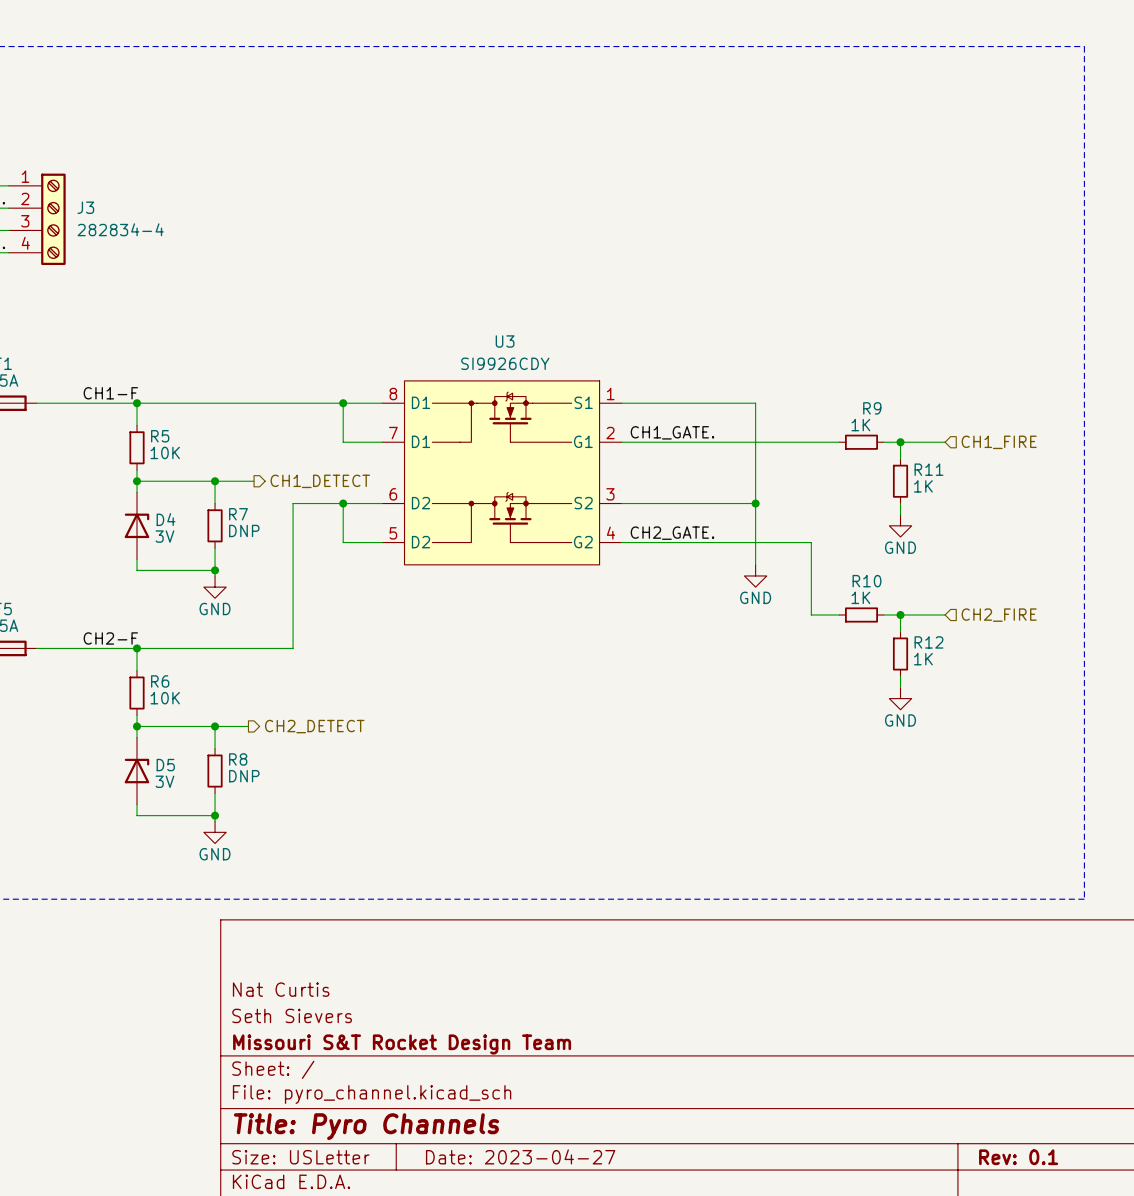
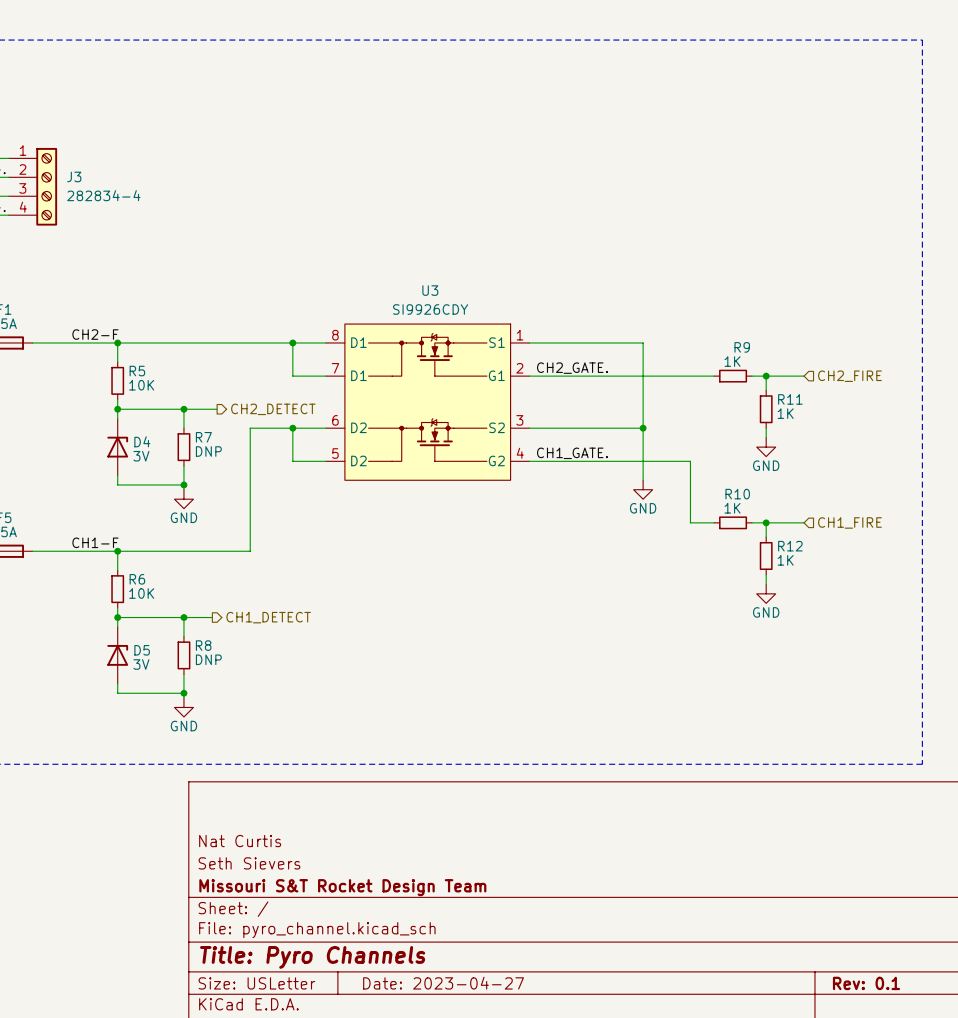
label: CH1-F (110, 393) -> CH2-F (95, 334)
label: CH1_GATE. (672, 432) -> CH2_GATE. (572, 368)
hierarchical label: CH1_FIRE (999, 442) -> CH2_FIRE (849, 376)
hierarchical label: CH1_DETECT (320, 481) -> CH2_DETECT (273, 409)
label: CH2_GATE. (672, 533) -> CH1_GATE. (572, 453)
hierarchical label: CH2_FIRE (999, 615) -> CH1_FIRE (849, 522)
label: CH2-F (110, 638) -> CH1-F (95, 542)
hierarchical label: CH2_DETECT (314, 726) -> CH1_DETECT (268, 617)

